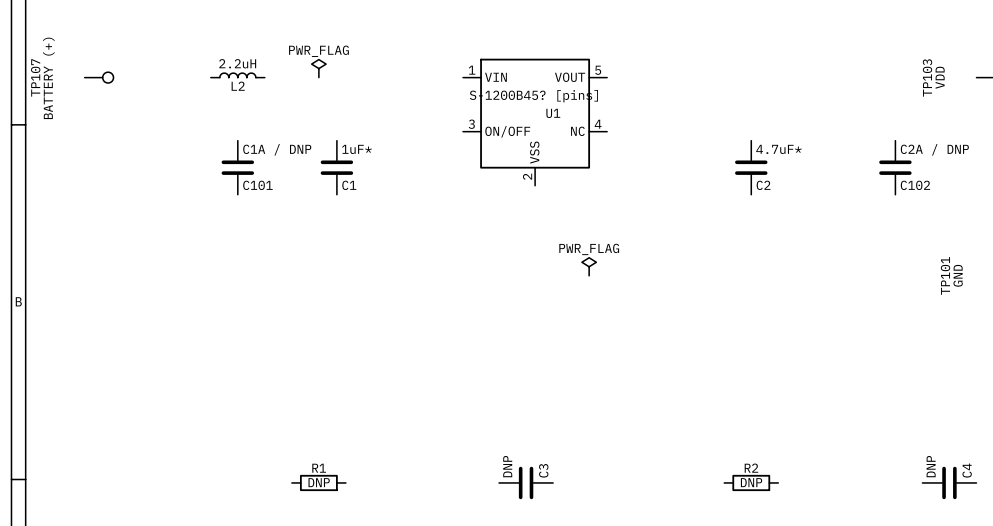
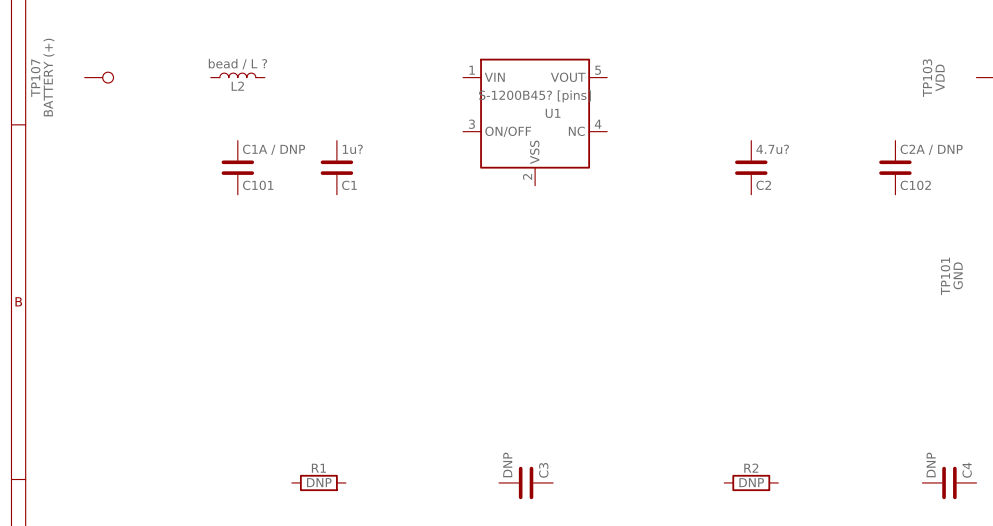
L2 value: 2.2uH (237, 63) -> bead / L ? (237, 64)
power symbol: PWR_FLAG (318, 68) -> none
C1 value: 1uF* (356, 149) -> 1u? (352, 149)
C2 value: 4.7uF* (778, 149) -> 4.7u? (772, 149)
power symbol: PWR_FLAG (589, 266) -> none

